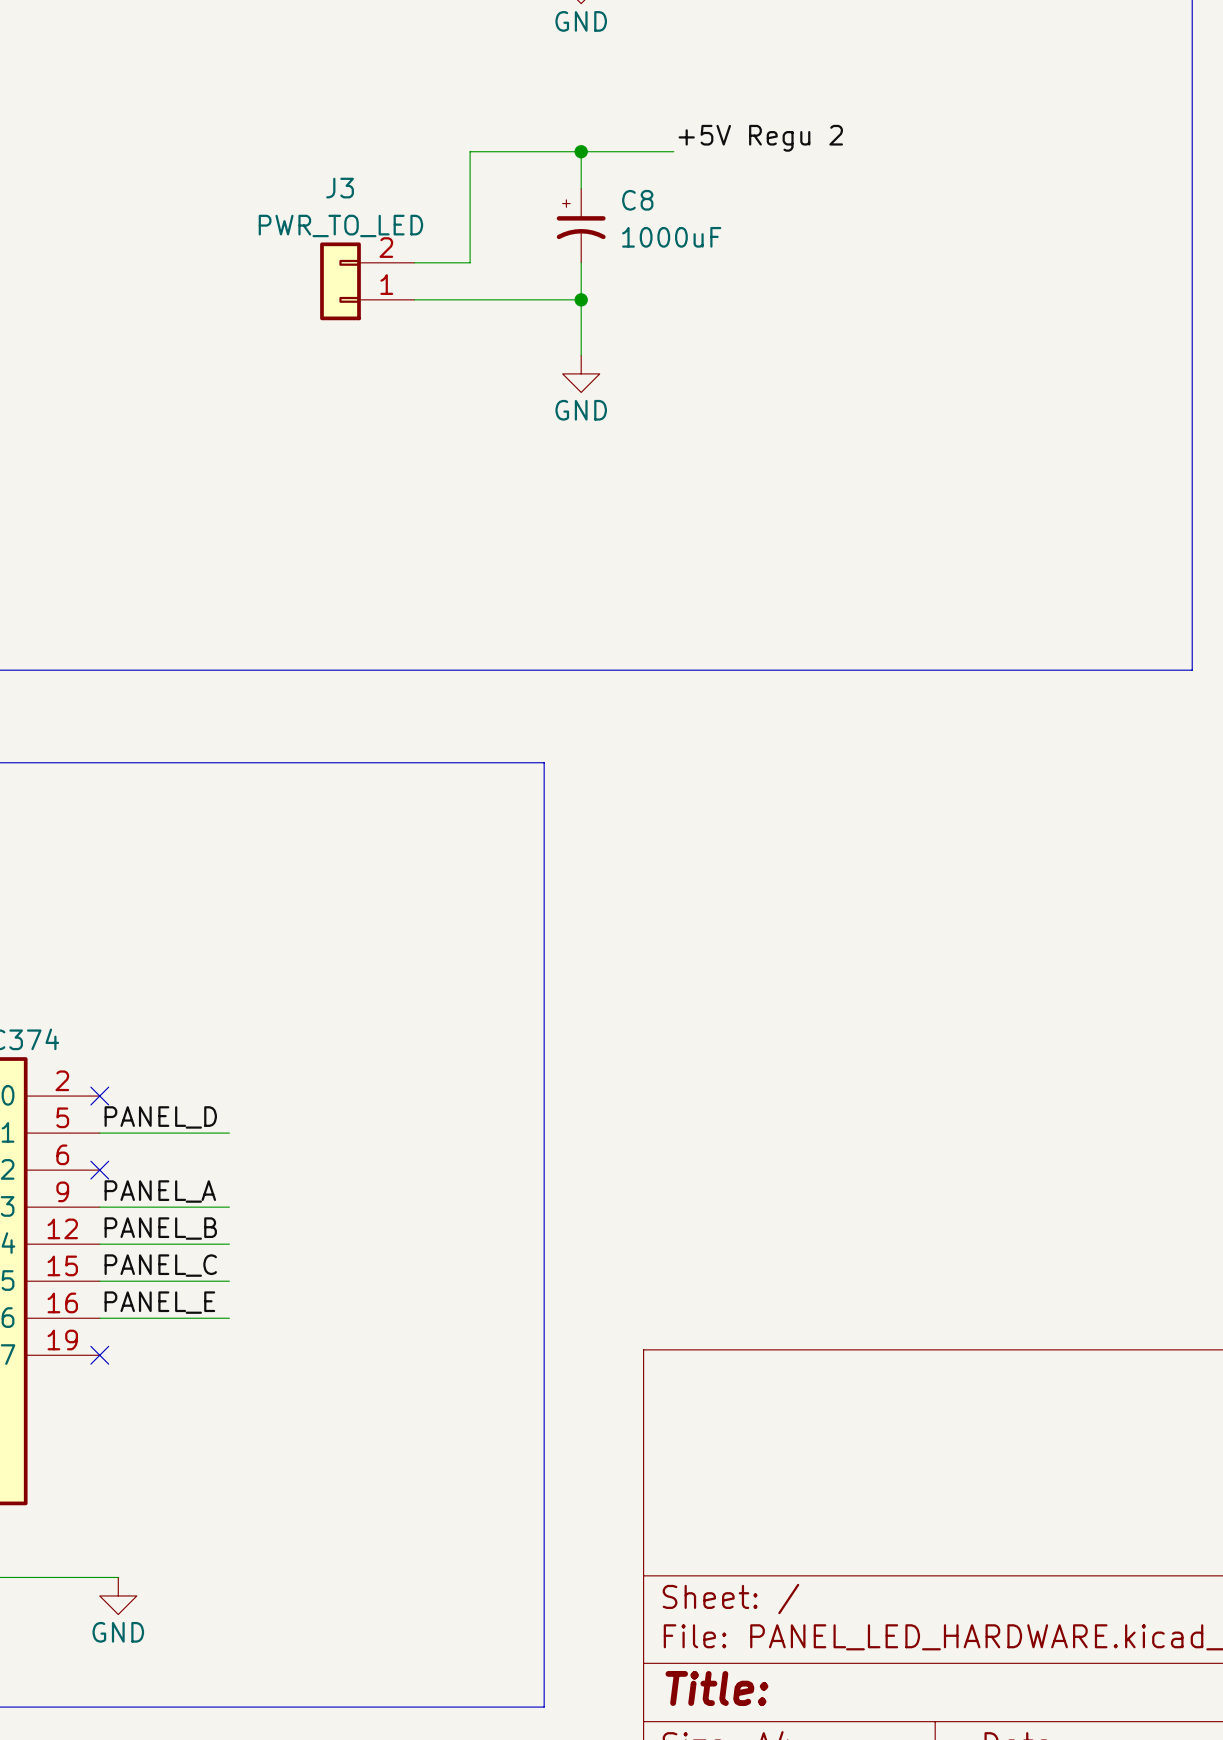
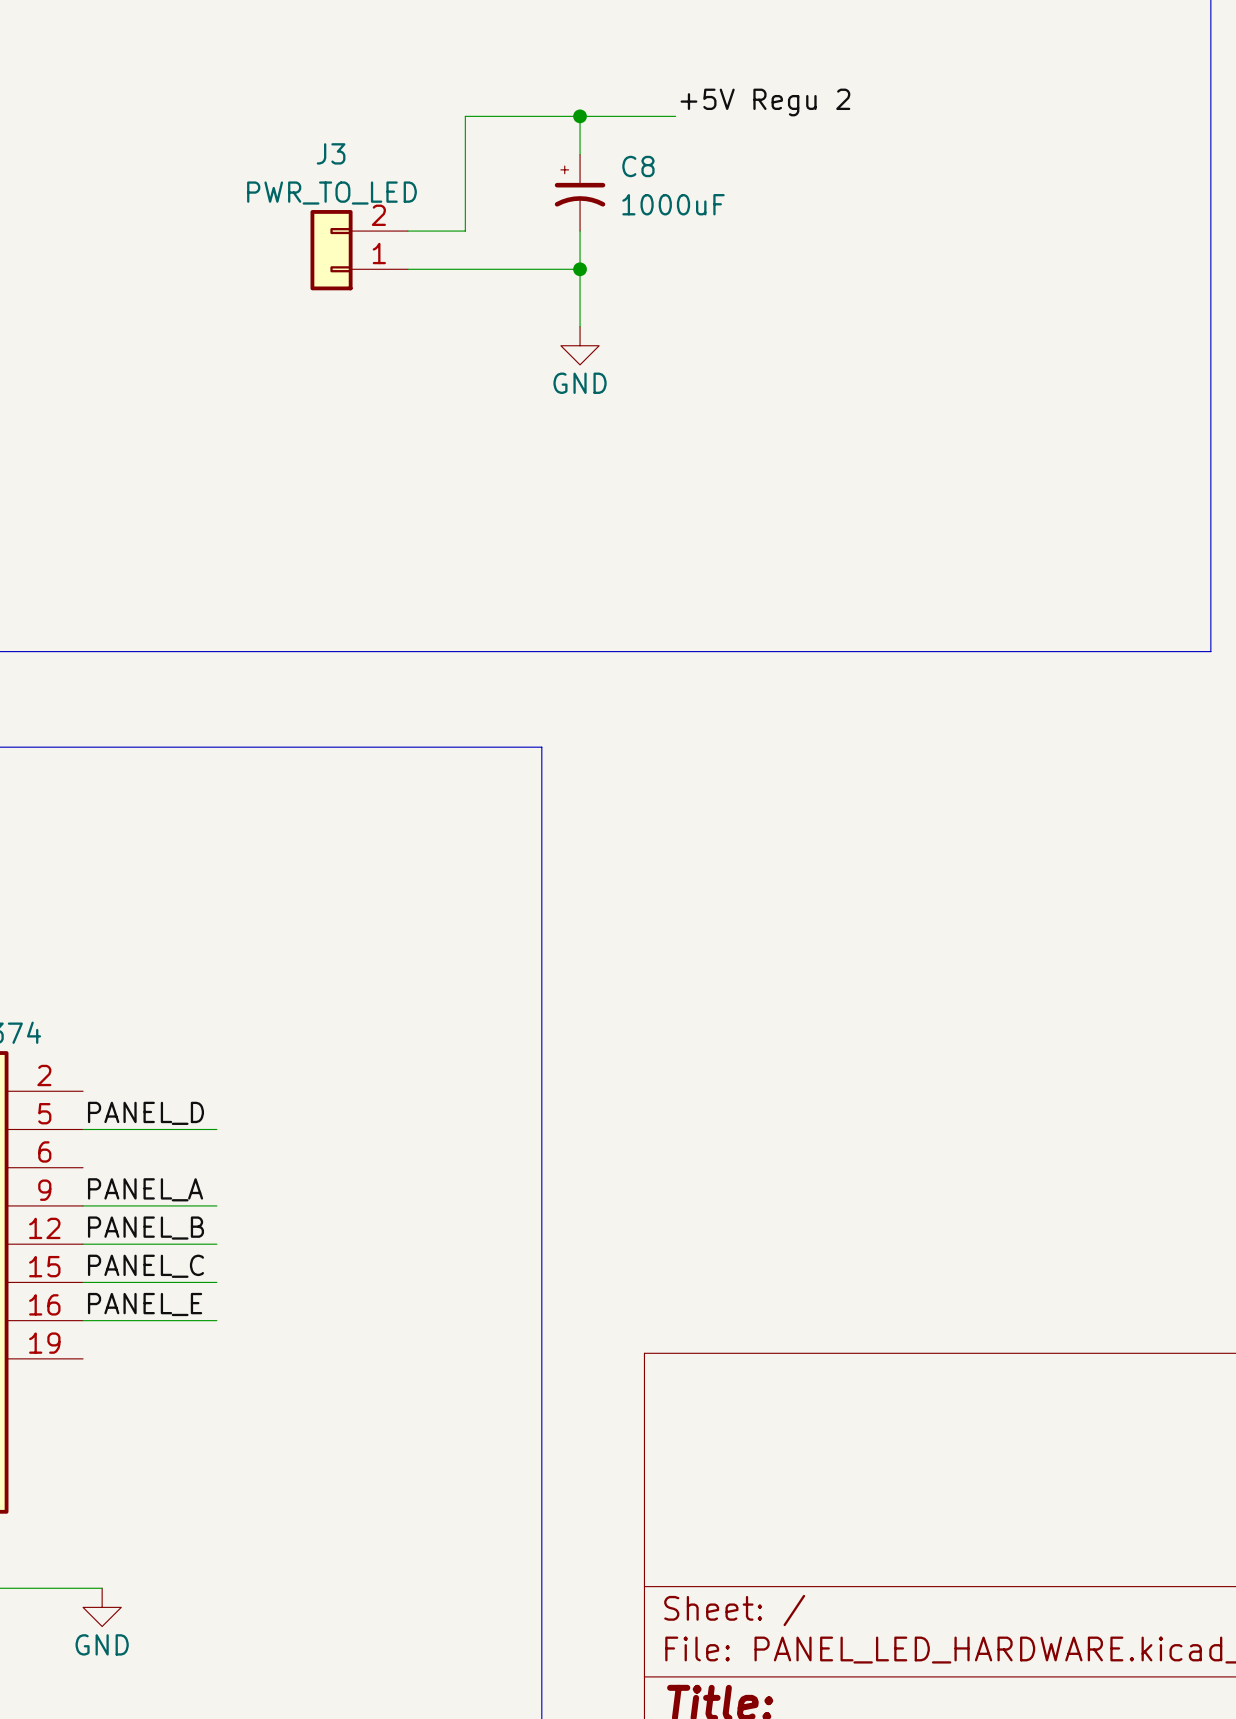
no-connect mark: (99, 1096) -> none
no-connect mark: (99, 1170) -> none
no-connect mark: (99, 1355) -> none

